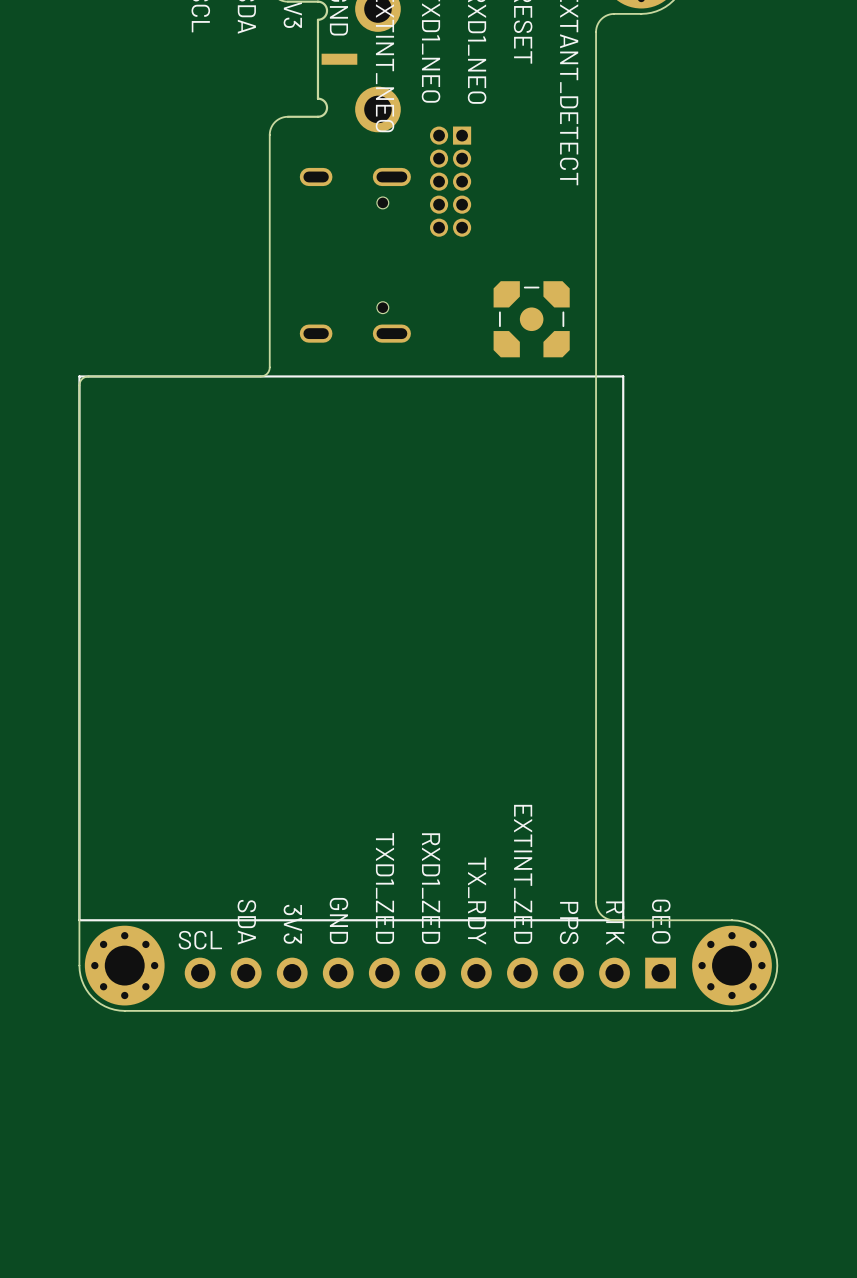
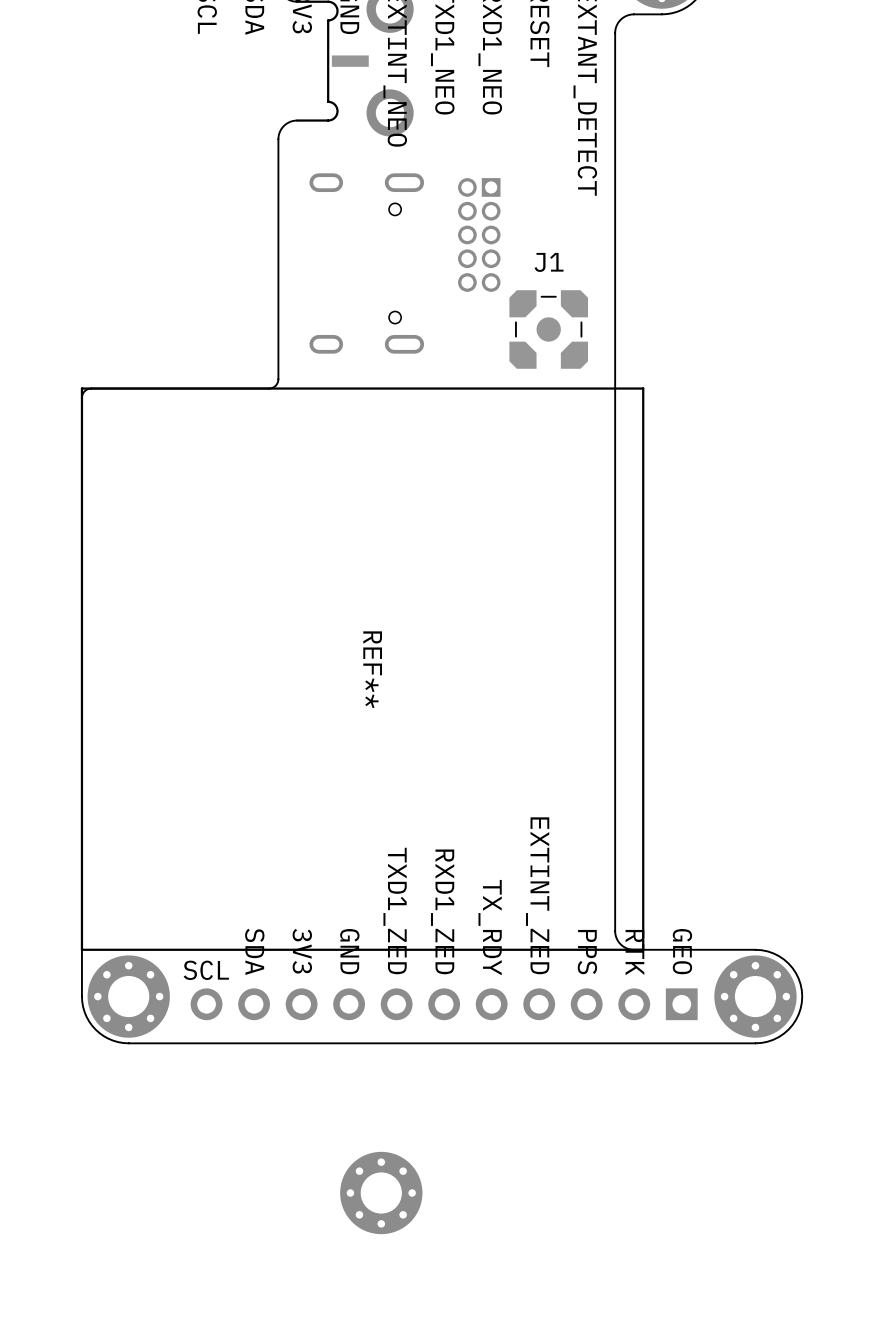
part position: (450, 181) -> (479, 234)
J1 name: none -> J1 (549, 262)
REF**: none -> (362, 669)
part: none -> (381, 1193)

